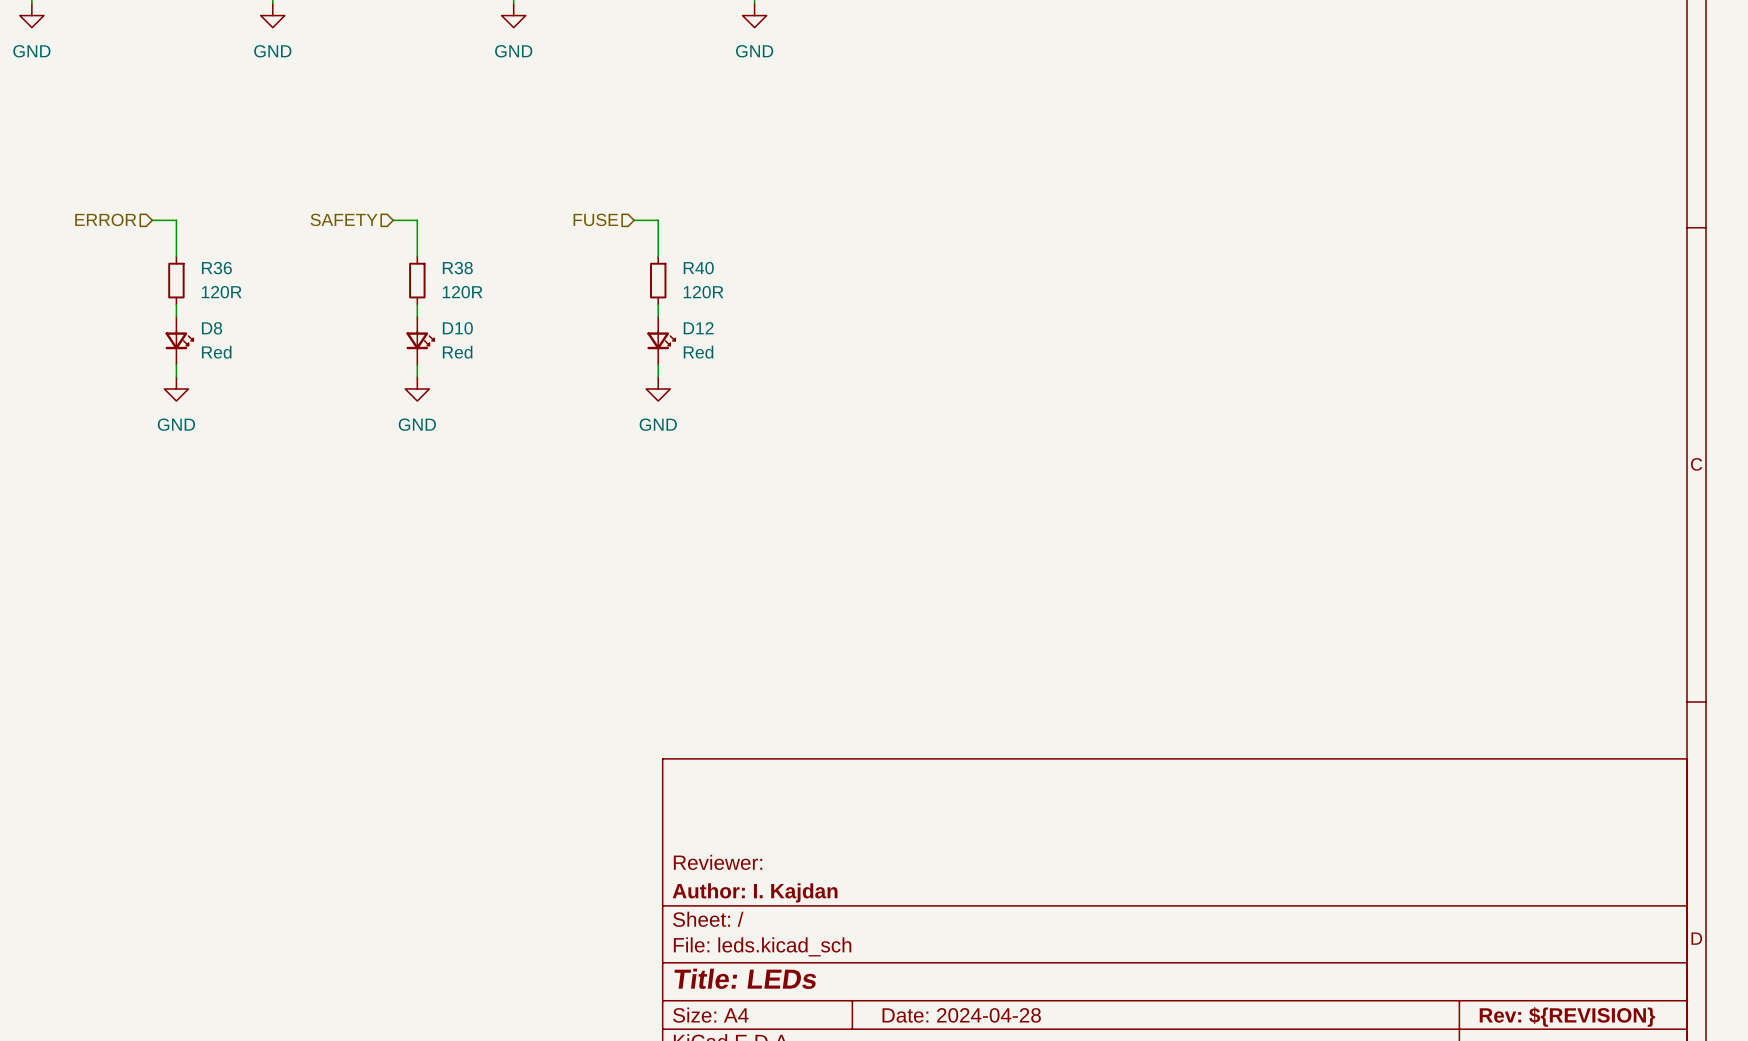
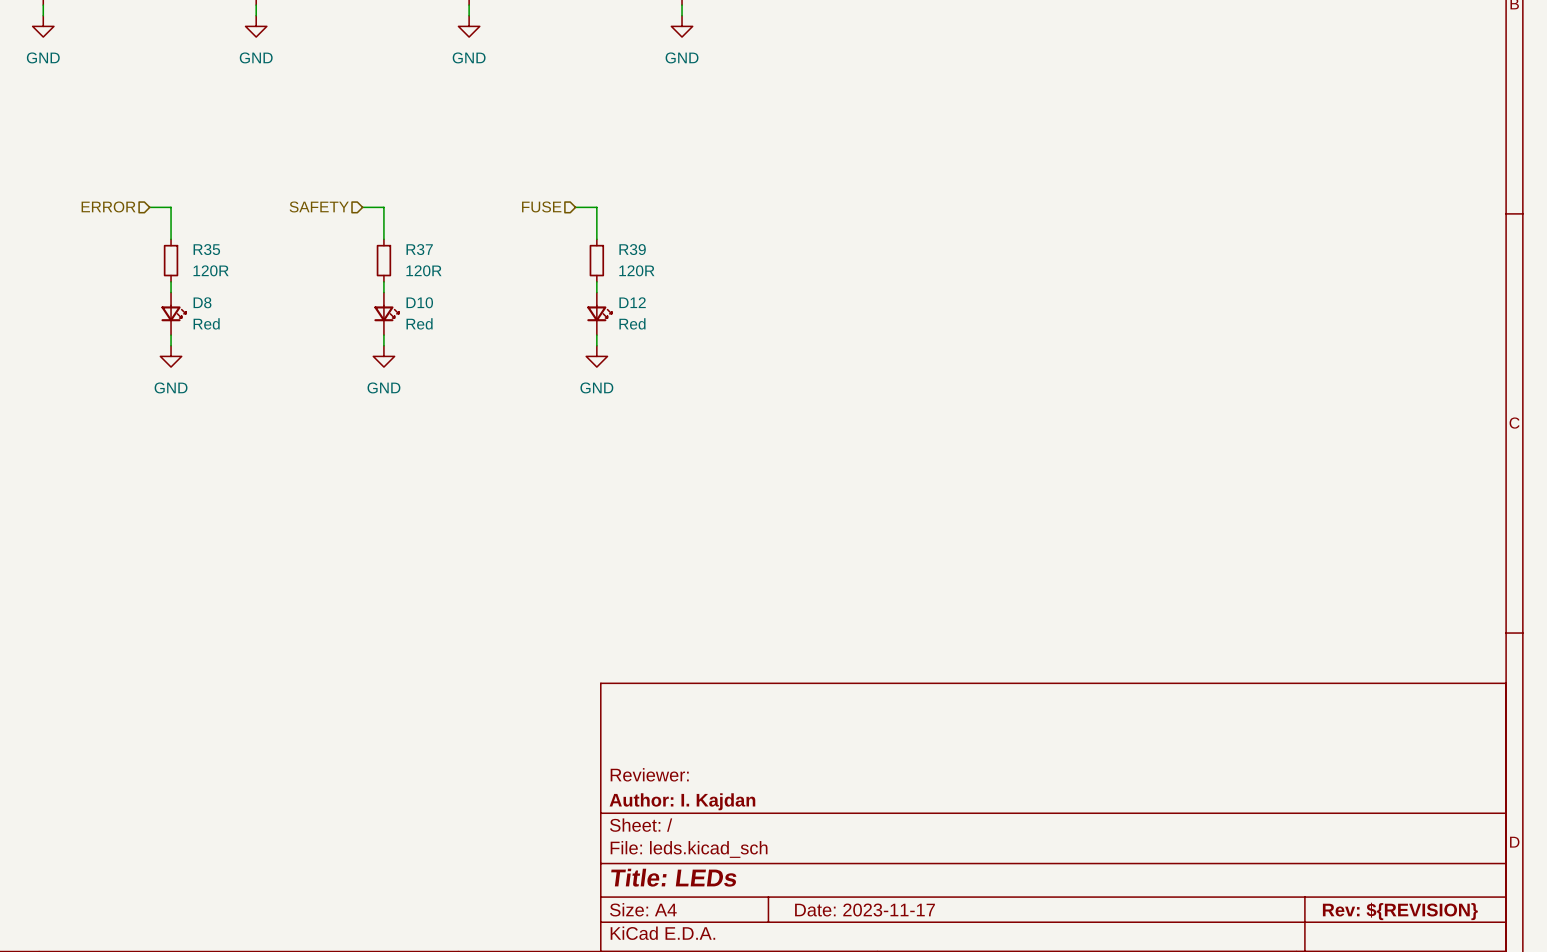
R36 name: R36 (216, 268) -> R35 (206, 249)
R38 name: R38 (457, 268) -> R37 (419, 249)
R40 name: R40 (698, 268) -> R39 (632, 249)
title block: Date: 2024-04-28 (961, 1015) -> Date: 2023-11-17 (865, 910)

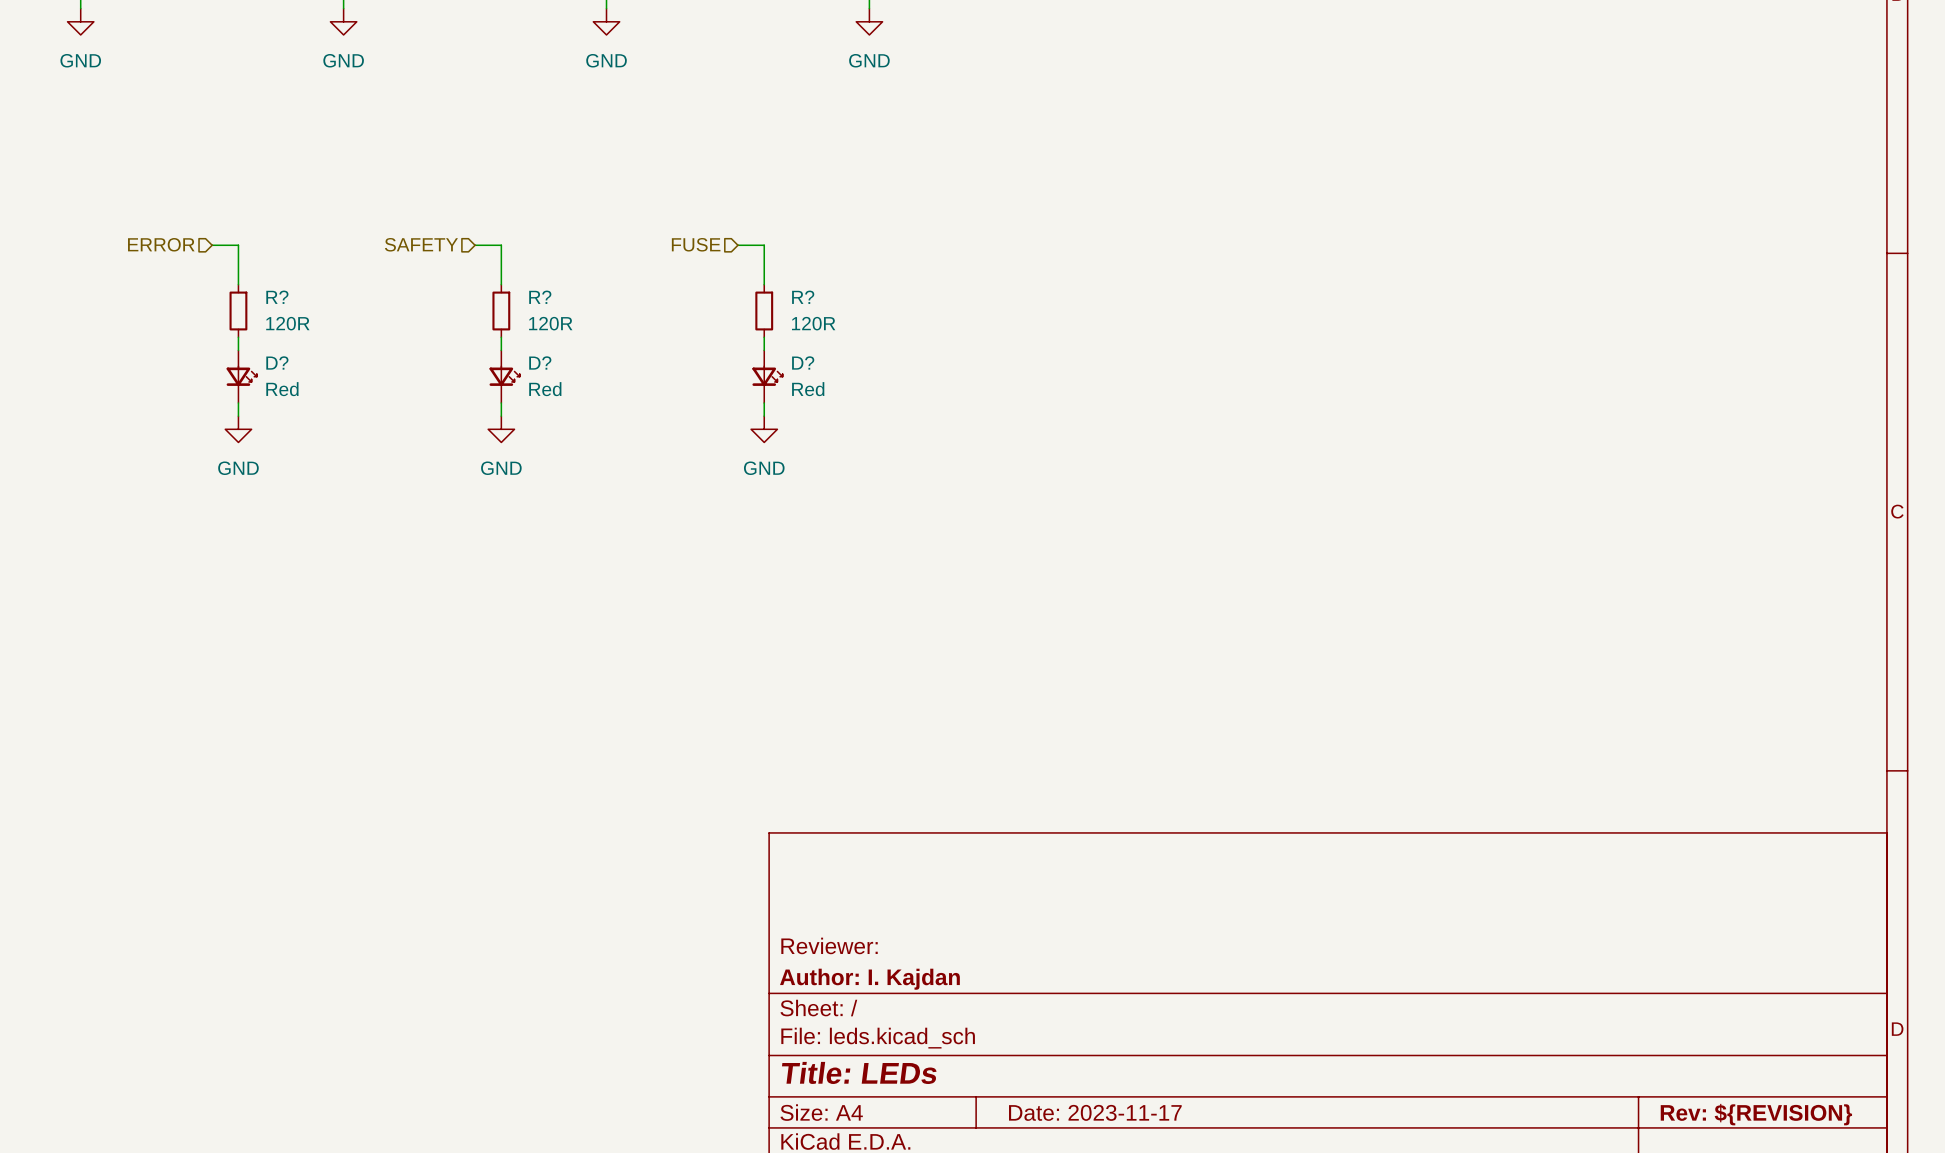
R35 name: R35 (206, 249) -> R? (277, 297)
R37 name: R37 (419, 249) -> R? (540, 297)
R39 name: R39 (632, 249) -> R? (803, 297)
D8 name: D8 (202, 302) -> D? (277, 362)
D10 name: D10 (419, 302) -> D? (540, 362)
D12 name: D12 (632, 302) -> D? (803, 362)

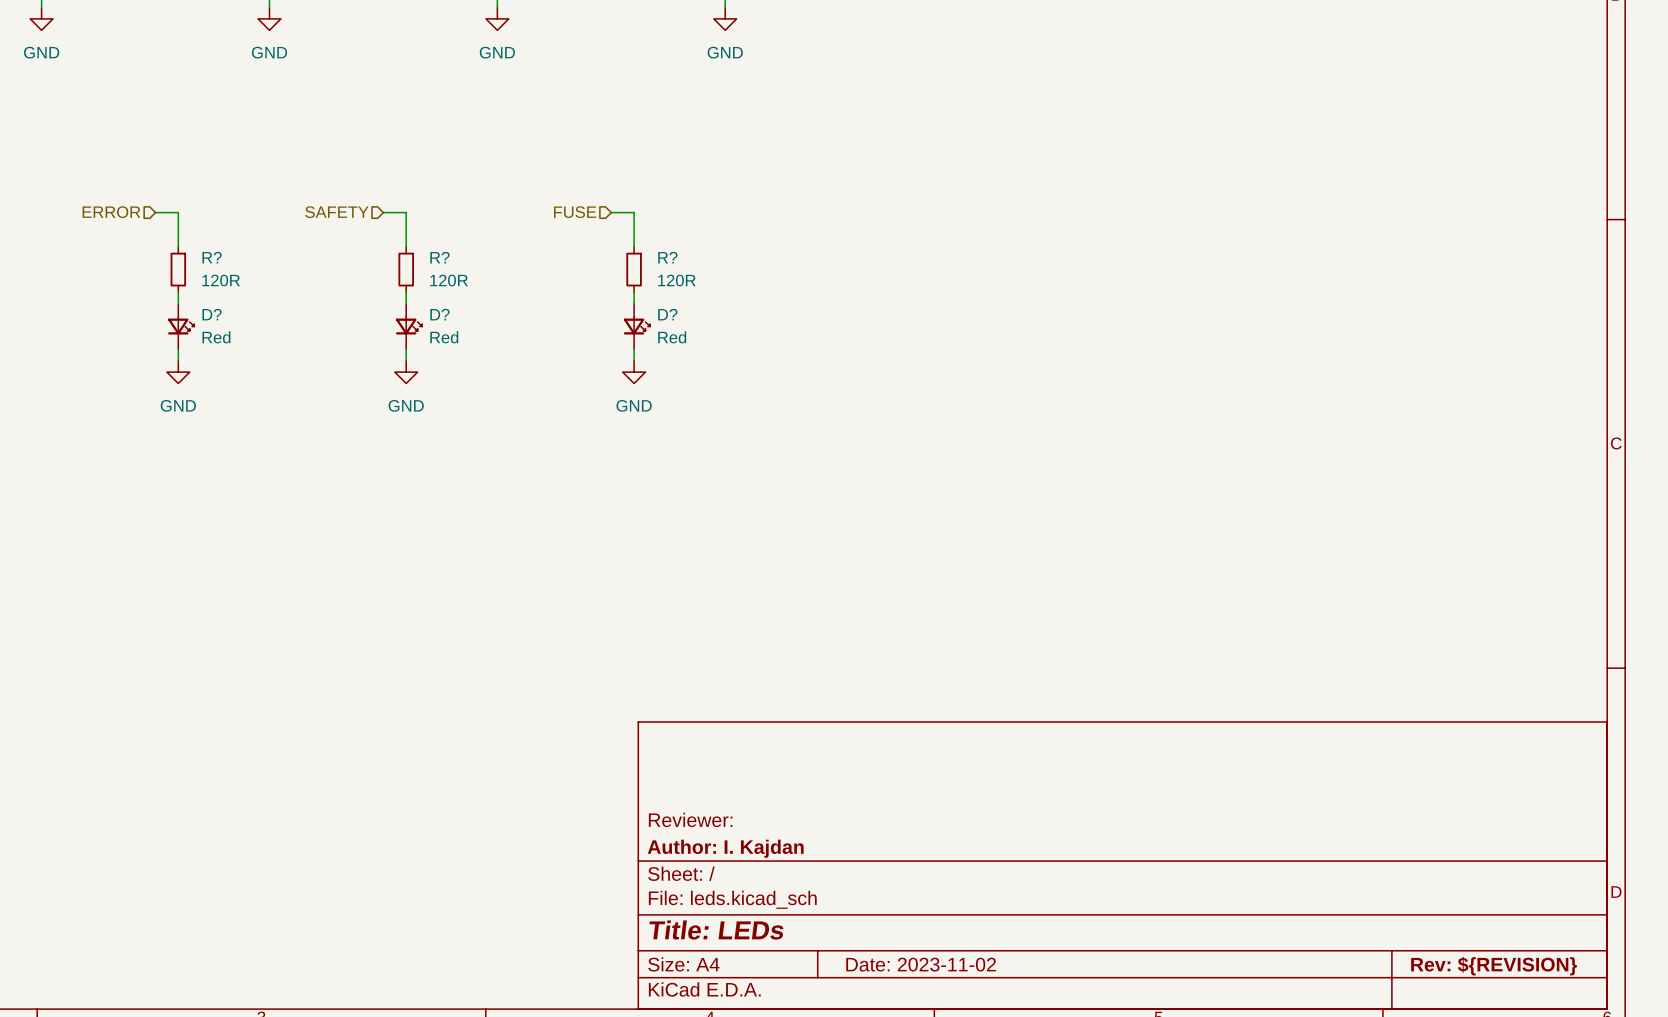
title block: Date: 2023-11-17 (1095, 1112) -> Date: 2023-11-02 (921, 964)

